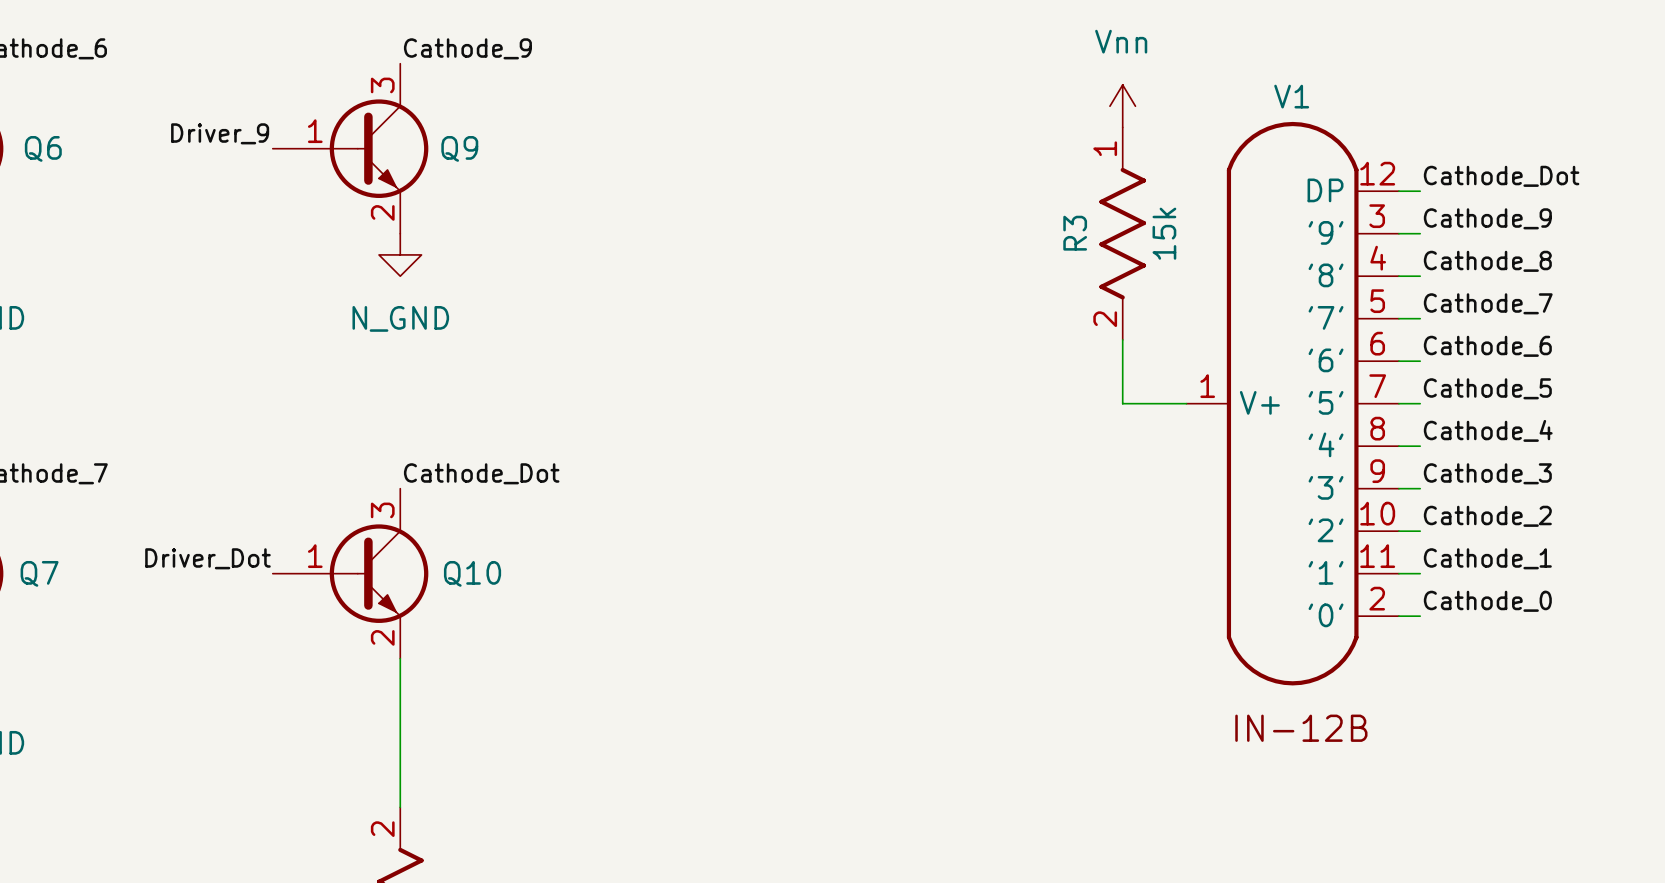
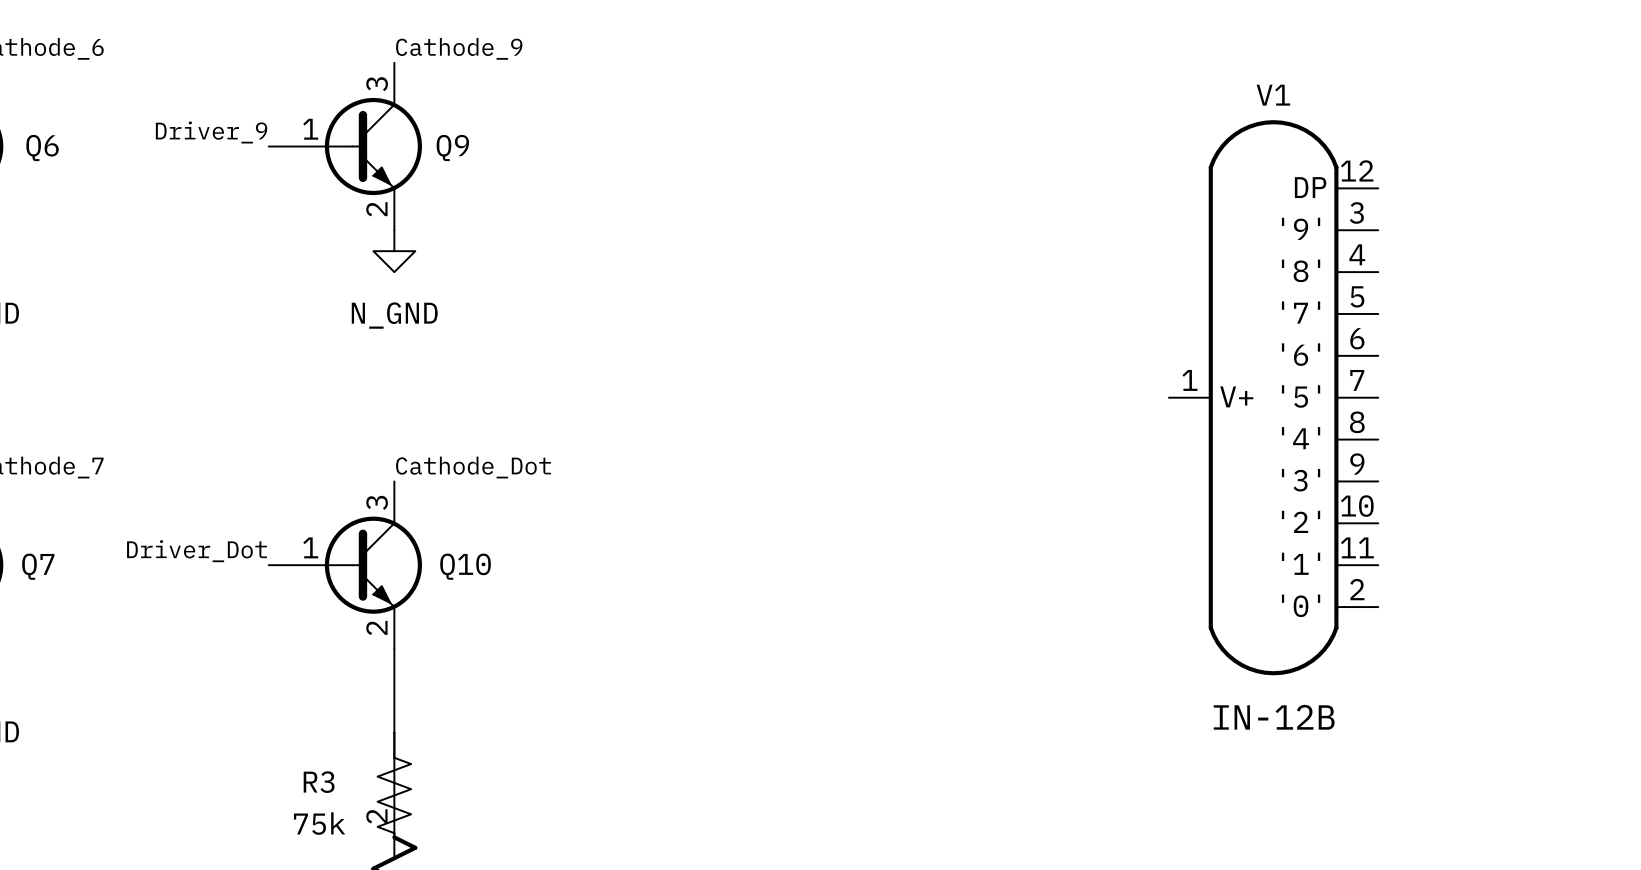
power symbol: Vnn (1122, 106) -> none
R3 symbol: [1099, 127, 1147, 340] -> [377, 732, 412, 859]
label: Cathode_Dot (1501, 176) -> none
wire: (1398, 191) (1420, 191) -> none
label: Cathode_9 (1487, 218) -> none
R3 value: 15k (1164, 233) -> 75k (319, 823)
wire: (1398, 233) (1420, 233) -> none
label: Cathode_8 (1487, 261) -> none
wire: (1398, 276) (1420, 276) -> none
label: Cathode_7 (1488, 303) -> none
wire: (1398, 318) (1420, 318) -> none
wire: (1122, 339) (1122, 403) (1186, 403) -> none
label: Cathode_6 (1487, 346) -> none
wire: (1398, 361) (1420, 361) -> none
label: Cathode_5 (1487, 388) -> none
wire: (1398, 403) (1420, 403) -> none
label: Cathode_4 (1488, 430) -> none
wire: (1398, 446) (1420, 446) -> none
label: Cathode_3 (1487, 473) -> none
wire: (1398, 488) (1420, 488) -> none
label: Cathode_2 (1487, 516) -> none
wire: (1398, 531) (1420, 531) -> none
label: Cathode_1 (1487, 558) -> none
wire: (1398, 573) (1420, 573) -> none
label: Cathode_0 (1487, 601) -> none
wire: (1398, 616) (1420, 616) -> none

